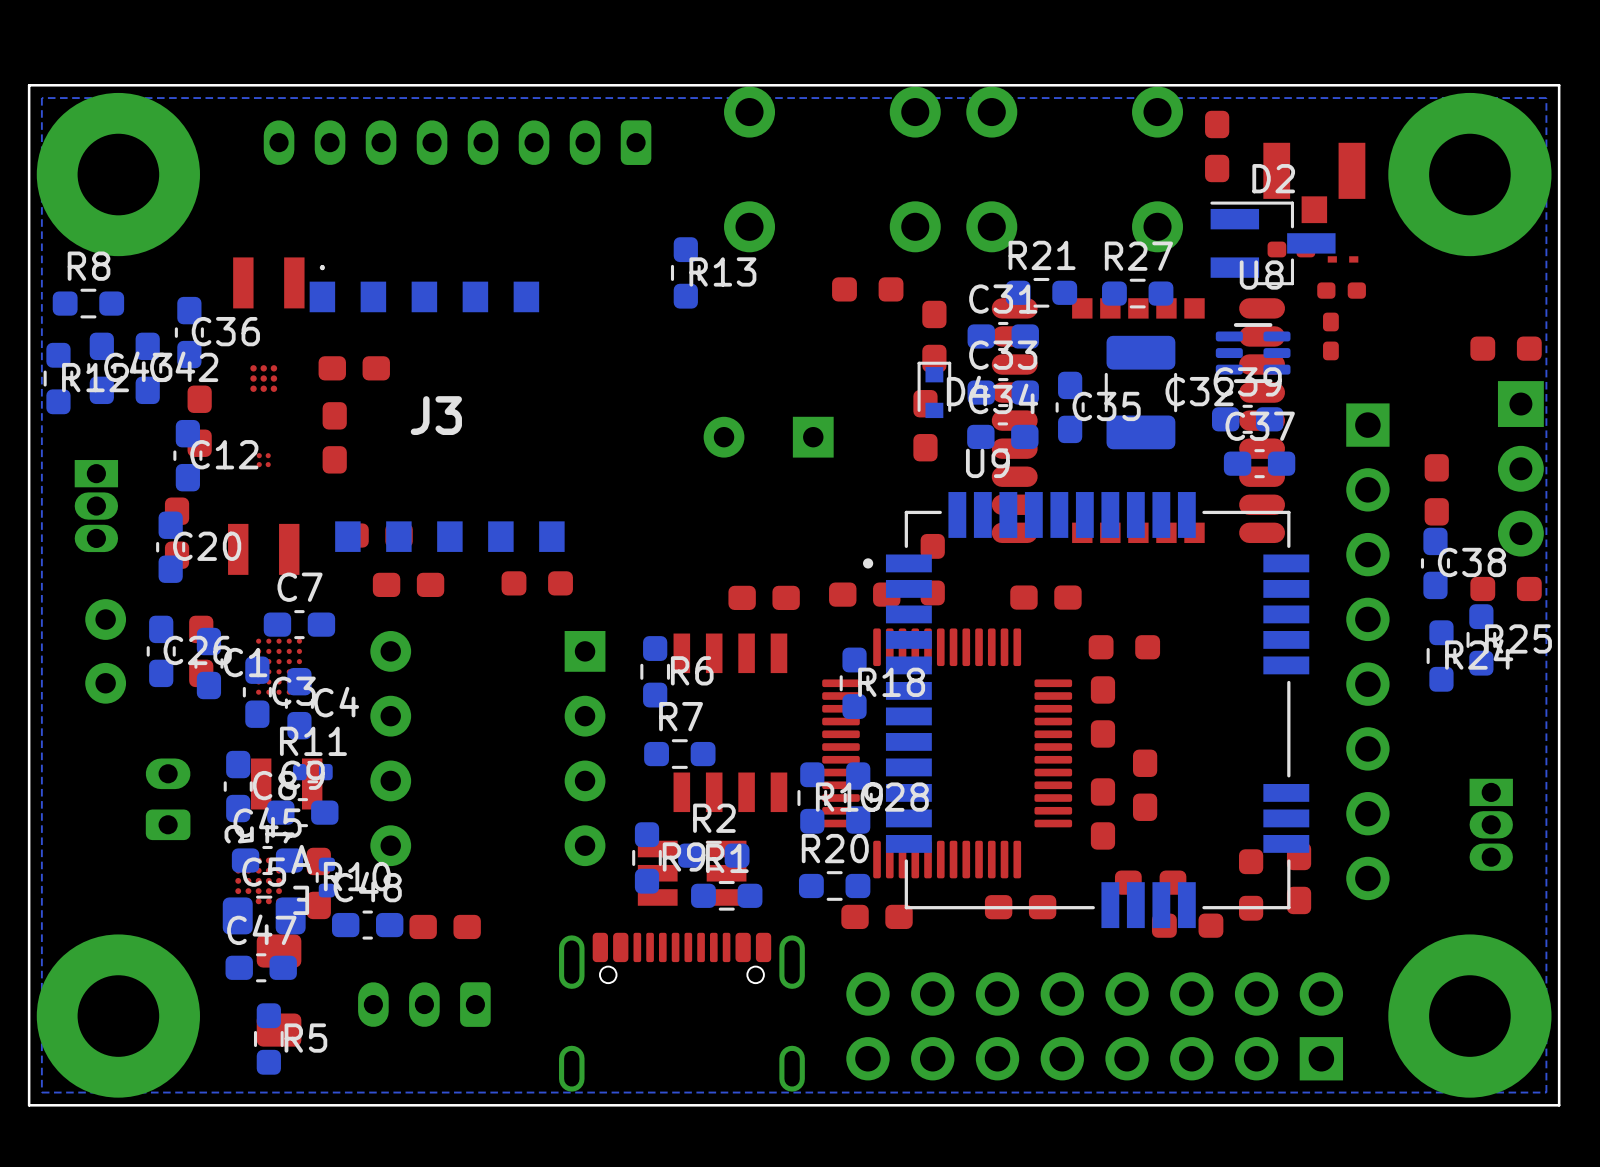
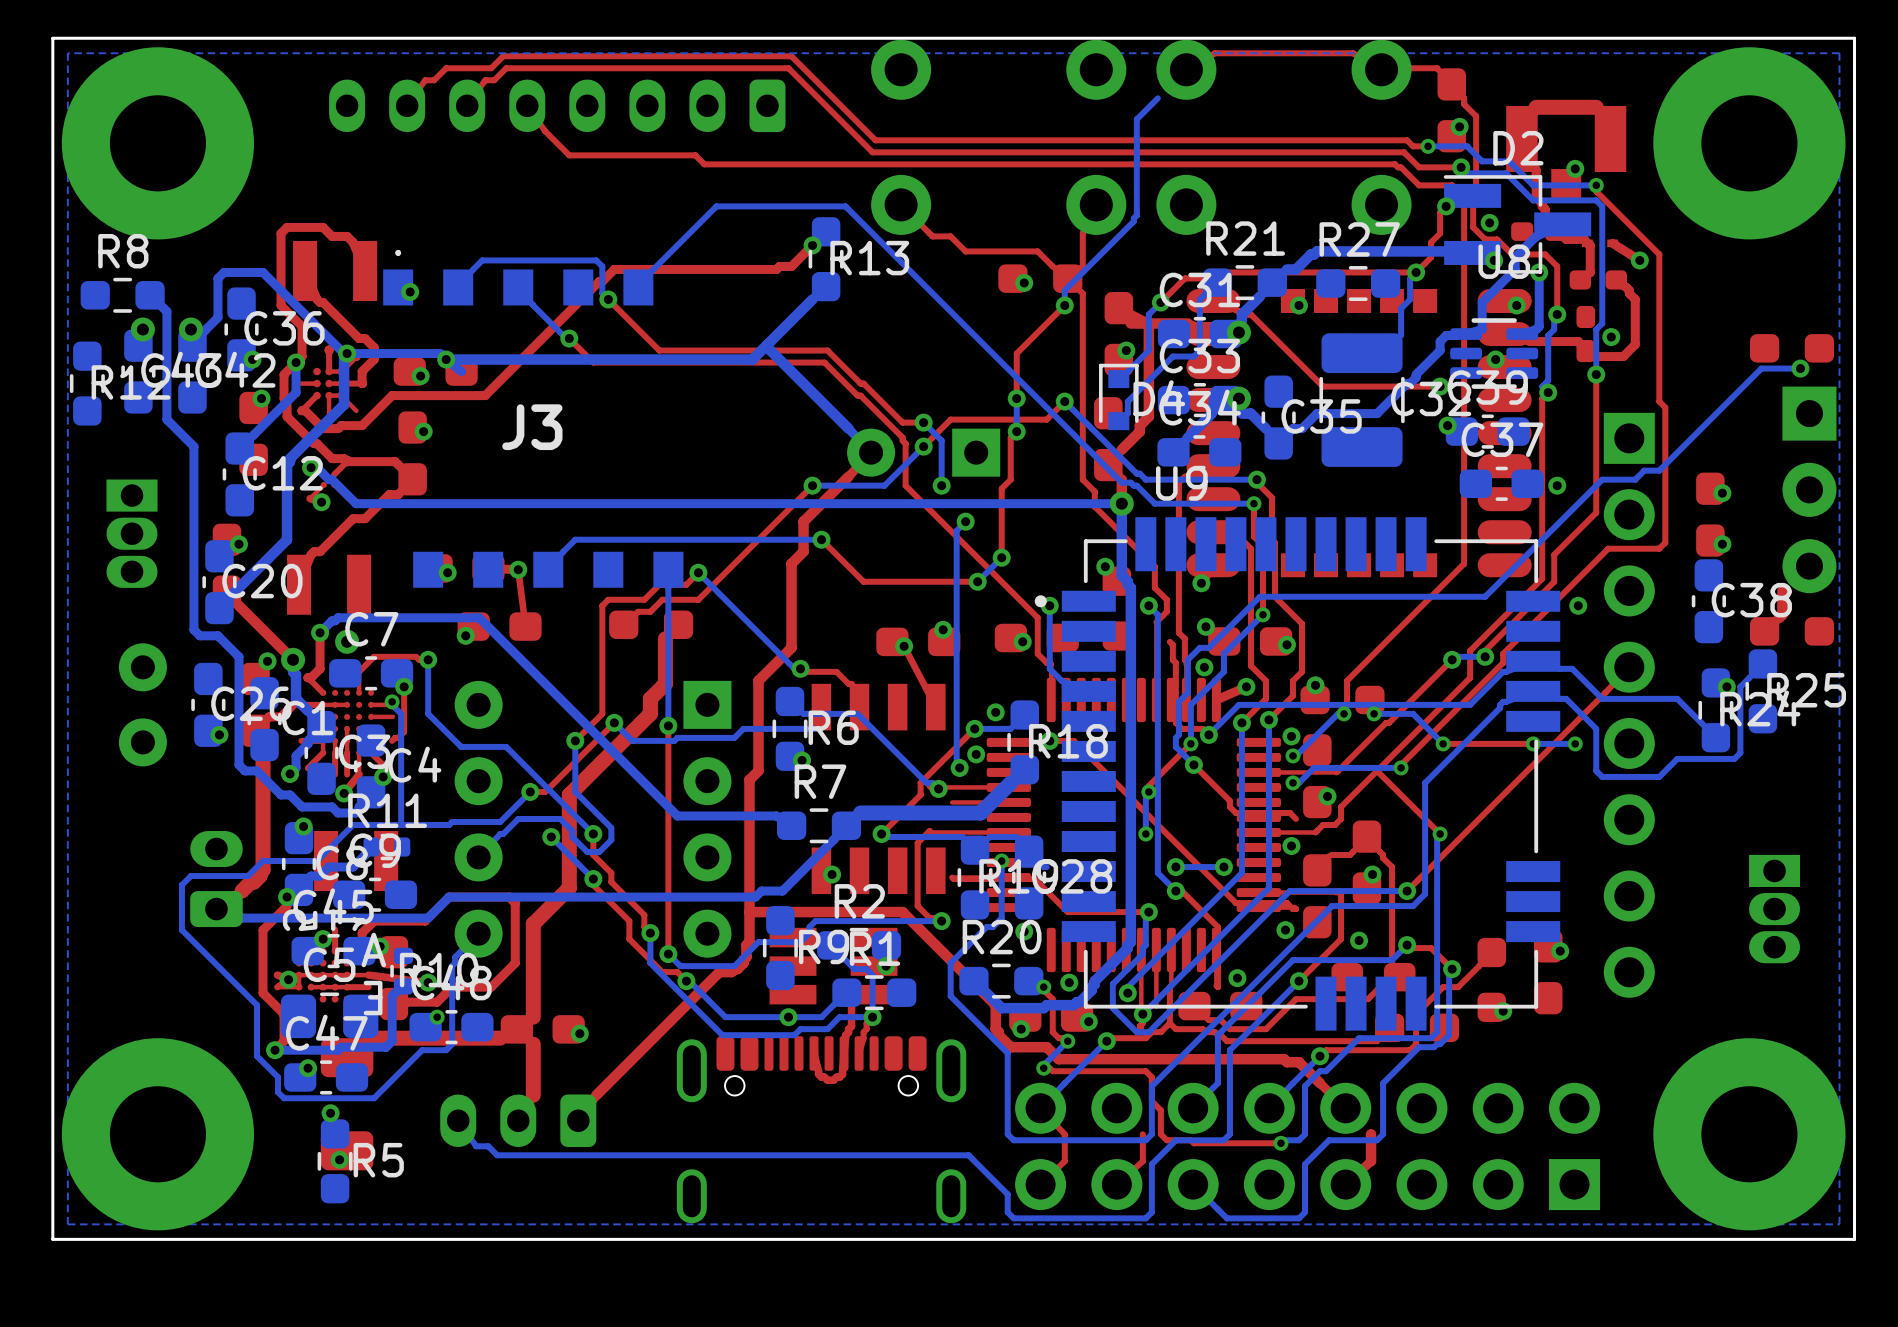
top track: none -> (1186, 69) (1214, 53) (1353, 53) (1381, 69) (1437, 68) (1464, 98) (1464, 104) (1476, 116) (1476, 200) (1473, 203) (1473, 227) (1485, 239) (1497, 239) (1512, 254) (1545, 254) (1557, 266) (1557, 314)
bottom track: none -> (1157, 98) (1136, 119) (1136, 215) (1133, 221) (1064, 290) (1064, 305)
top track: none -> (407, 105) (425, 80) (434, 80) (446, 68) (491, 68) (503, 56) (791, 56) (875, 140) (1407, 140) (1413, 146) (1428, 146)
top track: none -> (467, 105) (485, 80) (494, 80) (506, 68) (788, 68) (872, 152) (1404, 152) (1419, 167) (1461, 167)
top track: none -> (527, 105) (545, 131) (569, 155) (695, 155) (704, 164) (1395, 164) (1401, 167) (1419, 185) (1452, 185) (1464, 197) (1464, 563) (1347, 680) (1347, 704) (1344, 707) (1344, 713)
via: none -> (1459, 126)
top track: none -> (1610, 138) (1596, 107) (1536, 107) (1521, 138) (1536, 170) (1536, 197) (1545, 209) (1545, 224) (1566, 239) (1584, 239) (1590, 245) (1590, 272) (1580, 279)
bottom track: none -> (1428, 146) (1467, 146) (1482, 161) (1509, 161) (1533, 185) (1596, 185)
via: none -> (1428, 146)
bottom track: none -> (1461, 167) (1467, 173) (1506, 173) (1533, 200) (1596, 200) (1602, 206) (1602, 323) (1596, 329) (1596, 374)
via: none -> (1461, 167)
via: none -> (1575, 168)
top track: none -> (1596, 185) (1596, 191) (1659, 254) (1659, 401) (1665, 407) (1665, 542) (1659, 548) (1608, 548) (1503, 653) (1503, 662) (1401, 764) (1401, 767)
via: none -> (1596, 185)
top track: none -> (901, 204) (932, 236) (950, 236) (965, 251) (1037, 251) (1067, 278)
top track: none -> (1096, 204) (1082, 233) (1082, 266) (1067, 278)
top track: none -> (1446, 206) (1440, 212) (1440, 233) (1431, 242) (1431, 257) (1416, 272) (1226, 272) (1220, 278) (1184, 278) (1160, 302)
via: none -> (1446, 206)
via: none -> (1489, 222)
bottom track: none -> (1562, 224) (1536, 236) (1515, 257) (1515, 269) (1482, 302) (1482, 329) (1466, 334) (1446, 335) (1440, 341) (1440, 350) (1416, 374) (1416, 377) (1410, 383) (1407, 383) (1377, 413) (1317, 413) (1301, 428) (1292, 428) (1278, 443) (1250, 413) (1241, 413) (1225, 400) (1238, 398)
top track: none -> (1612, 243) (1639, 260)
top track: none -> (812, 245) (791, 266) (779, 266) (776, 269) (614, 269) (602, 281) (599, 281) (485, 395) (392, 395) (362, 425) (341, 425) (338, 428) (323, 428) (305, 410) (302, 410)
via: none -> (812, 245)
bottom track: none -> (1494, 260) (1472, 252) (1446, 251) (1317, 251) (1311, 254) (1295, 269) (1286, 269) (1272, 282) (1241, 314) (1241, 320) (1225, 334) (1238, 332)
via: none -> (1494, 260)
via: none -> (1639, 260)
top track: none -> (305, 270) (317, 299) (323, 302) (359, 338) (365, 338) (374, 347) (374, 359) (362, 371) (362, 383)
top track: none -> (365, 270) (353, 242) (347, 236) (332, 236) (323, 227) (287, 227) (281, 233) (281, 305) (302, 326) (302, 356) (284, 374) (284, 398) (287, 401) (287, 416) (332, 458) (344, 458) (347, 461)
bottom track: none -> (1416, 272) (1410, 278) (1410, 299) (1401, 308) (1401, 335)
via: none -> (1416, 272)
bottom track: none -> (1539, 272) (1539, 326) (1536, 329) (1522, 334)
via: none -> (1539, 272)
top track: none -> (1067, 278) (1082, 293) (1082, 479) (1094, 491) (1094, 506) (1154, 566) (1154, 587) (1166, 599) (1166, 611) (1156, 622) (1156, 700)
top track: none -> (1616, 279) (1629, 290) (1629, 293) (1635, 299) (1635, 344) (1623, 356) (1593, 356) (1578, 341) (1530, 341) (1504, 334)
bottom track: none -> (1217, 282) (1199, 299) (1199, 350) (1193, 356) (1172, 356) (1127, 401) (1127, 413) (1118, 421)
via: none -> (1024, 282)
bottom track: none -> (458, 287) (482, 260) (596, 260) (602, 266) (602, 293) (608, 299)
bottom track: none -> (518, 287) (566, 338) (569, 338)
bottom track: none -> (638, 287) (653, 269) (716, 206) (845, 206) (1121, 482) (1130, 482) (1136, 485) (1154, 503) (1253, 503)
bottom track: none -> (826, 286) (752, 359) (446, 359)
via: none -> (410, 291)
bottom track: none -> (150, 295) (166, 311) (166, 419) (193, 446) (193, 629) (199, 635) (217, 635) (238, 656) (238, 764) (245, 770) (257, 770) (281, 794) (290, 794) (302, 806) (332, 806) (338, 812) (356, 812) (383, 776)
top track: none -> (608, 299) (659, 350) (827, 350) (902, 422) (923, 422)
via: none -> (608, 299)
top track: none -> (1213, 300) (1250, 314) (1323, 386) (1440, 386)
bottom track: none -> (1160, 302) (1148, 314) (1148, 350) (1118, 379)
via: none -> (1160, 302)
top track: none -> (1064, 305) (1016, 353) (1016, 398)
via: none -> (1064, 305)
via: none -> (1298, 305)
via: none -> (1516, 305)
bottom track: none -> (1557, 314) (1554, 317) (1554, 329) (1548, 335) (1548, 380) (1542, 386) (1548, 392)
via: none -> (1557, 314)
via: none -> (142, 329)
bottom track: none -> (190, 329) (192, 345) (217, 317) (217, 278) (223, 272) (263, 272) (344, 353)
via: none -> (190, 329)
top track: none -> (1238, 332) (1213, 334) (1187, 323) (1130, 323) (1118, 308) (1148, 323) (1148, 416) (1139, 425) (1139, 431) (1108, 465) (1121, 479) (1121, 503)
via: none -> (1238, 332)
via: none -> (1611, 337)
top track: none -> (569, 338) (593, 362) (824, 362) (902, 437) (905, 443) (905, 485) (1037, 617) (1037, 653) (1046, 662) (1051, 664) (1051, 700)
via: none -> (569, 338)
bottom track: none -> (767, 344) (767, 347) (871, 452)
top track: none -> (329, 349) (329, 371) (341, 371) (356, 356)
via: none -> (1126, 350)
bottom track: none -> (344, 353) (440, 353) (446, 359)
bottom track: none -> (344, 353) (344, 404) (290, 458) (287, 464) (287, 539) (219, 608)
via: none -> (347, 353)
via: none -> (252, 359)
bottom track: none -> (446, 359) (461, 371)
via: none -> (446, 359)
via: none -> (1495, 359)
bottom track: none -> (296, 362) (296, 392) (239, 448)
via: none -> (296, 362)
bottom track: none -> (1800, 368) (1761, 368) (1659, 470) (1644, 470) (1635, 479) (1602, 479) (1485, 596) (1259, 596) (1208, 647) (1199, 647) (1187, 659) (1187, 692) (1178, 701) (1178, 734) (1175, 737) (1175, 746) (1193, 764)
via: none -> (1800, 368)
top track: none -> (1596, 374) (1596, 512) (1554, 554) (1554, 581) (1485, 650) (1485, 656)
via: none -> (1596, 374)
via: none -> (420, 376)
top track: none -> (317, 383) (295, 383)
top track: none -> (362, 383) (329, 383)
via: none -> (1440, 386)
top track: none -> (1548, 392) (1542, 398) (1542, 578) (1470, 650) (1470, 677) (1341, 806) (1341, 818) (1335, 824) (1323, 824) (1315, 832) (1258, 832)
via: none -> (1548, 392)
top track: none -> (317, 395) (301, 410)
via: none -> (261, 398)
bottom track: none -> (1016, 398) (1016, 431)
via: none -> (1016, 398)
via: none -> (1238, 398)
bottom track: none -> (1213, 400) (1211, 413) (1173, 452)
top track: none -> (1064, 401) (1046, 419) (950, 419) (923, 446)
bottom track: none -> (1064, 401) (1136, 473) (1139, 473) (1145, 479) (1256, 479)
via: none -> (1064, 401)
top track: none -> (356, 410) (341, 395) (329, 395) (329, 417)
bottom track: none -> (923, 422) (941, 440) (941, 485)
via: none -> (923, 422)
via: none -> (1447, 425)
via: none -> (423, 431)
top track: none -> (1016, 431) (1010, 437) (1010, 479) (1001, 488) (1001, 557)
via: none -> (1016, 431)
bottom track: none -> (923, 446) (884, 485) (812, 485)
via: none -> (923, 446)
top track: none -> (871, 452) (803, 521) (803, 551) (791, 563) (791, 647) (758, 680) (758, 770) (749, 779) (749, 942) (746, 945) (746, 957) (737, 969) (731, 972) (719, 972) (596, 1095) (578, 1120)
top track: none -> (347, 461) (334, 474)
top track: none -> (347, 461) (395, 461) (412, 479) (398, 494) (389, 494) (365, 518) (353, 518) (320, 551) (314, 551) (299, 584)
top track: none -> (1213, 466) (1184, 476) (1178, 482) (1178, 632) (1184, 638) (1184, 659) (1187, 662) (1186, 700)
bottom track: none -> (311, 467) (317, 467) (329, 479) (332, 479) (356, 503) (1121, 503) (1121, 575) (1130, 587) (1130, 942) (1127, 948) (1094, 981) (1091, 990) (1079, 1002) (1073, 1005) (1046, 1005) (1043, 1008) (1001, 1008) (973, 981)
via: none -> (311, 467)
top track: none -> (1256, 479) (1256, 482) (1271, 497) (1271, 539) (1274, 542) (1274, 596) (1301, 623) (1301, 671) (1292, 680) (1292, 695) (1268, 719)
via: none -> (1256, 479)
top track: none -> (323, 484) (310, 498) (321, 502)
top track: none -> (812, 485) (698, 599) (662, 599) (650, 611) (638, 611) (623, 624)
via: none -> (812, 485)
via: none -> (941, 485)
via: none -> (1557, 485)
via: none -> (1722, 493)
via: none -> (321, 502)
via: none -> (1121, 503)
top track: none -> (1253, 503) (1253, 536) (1262, 545) (1262, 614)
via: none -> (1253, 503)
bottom track: none -> (965, 521) (956, 530) (956, 764) (959, 767)
via: none -> (965, 521)
top track: none -> (1213, 532) (1238, 542) (1244, 542) (1250, 548) (1250, 665) (1265, 680) (1265, 698) (1241, 722)
top track: none -> (821, 539) (863, 581) (977, 581)
bottom track: none -> (821, 539) (575, 539) (548, 569)
via: none -> (821, 539)
via: none -> (238, 544)
via: none -> (1722, 544)
bottom track: none -> (1001, 557) (977, 581)
via: none -> (1001, 557)
via: none -> (1105, 566)
top track: none -> (488, 568) (518, 569) (525, 626)
via: none -> (518, 569)
bottom track: none -> (668, 569) (668, 725)
via: none -> (447, 572)
top track: none -> (698, 572) (686, 584) (659, 584) (644, 599) (608, 599) (602, 605) (602, 713) (575, 740)
bottom track: none -> (698, 572) (794, 668) (800, 668)
via: none -> (698, 572)
via: none -> (977, 581)
via: none -> (1201, 583)
top track: none -> (1782, 590) (1782, 614) (1764, 631)
top track: none -> (226, 591) (293, 659)
bottom track: none -> (1049, 605) (1049, 668) (1061, 680) (1088, 691)
via: none -> (1049, 605)
bottom track: none -> (1148, 605) (1157, 614) (1157, 873) (1175, 891)
via: none -> (1148, 605)
via: none -> (1578, 605)
bottom track: none -> (1262, 614) (1223, 653) (1223, 671) (1190, 704) (1190, 743)
via: none -> (1262, 614)
top track: none -> (678, 624) (665, 638) (665, 683) (650, 698) (650, 713) (569, 794) (569, 888) (533, 924) (533, 1017) (516, 1029)
via: none -> (1205, 626)
via: none -> (943, 629)
top track: none -> (320, 632) (320, 668) (311, 677) (308, 677)
bottom track: none -> (320, 632) (332, 620) (338, 617) (479, 617) (677, 815) (776, 815) (791, 825)
via: none -> (320, 632)
via: none -> (465, 635)
via: none -> (347, 641)
top track: none -> (892, 641) (904, 646) (935, 707)
via: none -> (1022, 641)
top track: none -> (1169, 641) (1172, 644) (1172, 659) (1175, 662) (1175, 722) (1181, 728) (1202, 728) (1208, 734)
via: none -> (1286, 644)
via: none -> (904, 646)
bottom track: none -> (1485, 656) (1455, 656) (1452, 659)
via: none -> (1485, 656)
bottom track: none -> (293, 659) (293, 671) (296, 674) (296, 698) (321, 727) (296, 755) (296, 767) (290, 773)
via: none -> (293, 659)
top track: none -> (428, 659) (419, 659) (416, 656) (374, 656) (359, 671) (359, 692)
bottom track: none -> (428, 659) (428, 713) (461, 746) (506, 746) (593, 833)
via: none -> (428, 659)
top track: none -> (1452, 659) (1336, 772) (1258, 772)
via: none -> (1452, 659)
via: none -> (267, 661)
bottom track: none -> (1762, 663) (1740, 686) (1740, 752) (1734, 758) (1677, 758) (1659, 776) (1602, 776) (1596, 770) (1596, 728) (1566, 698) (1533, 691) (1503, 701) (1500, 707) (1425, 782) (1425, 894) (1413, 906) (1332, 906) (1151, 1086) (1151, 1134) (1145, 1140) (1013, 1140) (1007, 1134) (1007, 1053) (950, 996) (950, 963) (986, 927) (992, 927) (1001, 918) (1001, 861)
via: none -> (1204, 667)
top track: none -> (1629, 667) (1407, 891)
top track: none -> (800, 668) (803, 671) (836, 671) (848, 683) (851, 683) (859, 707)
via: none -> (800, 668)
top track: none -> (307, 677) (323, 692)
via: none -> (1315, 685)
top track: none -> (404, 686) (404, 731) (392, 740)
via: none -> (404, 686)
top track: none -> (1246, 686) (1216, 700)
via: none -> (1246, 686)
via: none -> (1726, 686)
bottom track: none -> (392, 701) (392, 704) (401, 713) (401, 824)
via: none -> (392, 701)
bottom track: none -> (790, 701) (803, 713) (857, 713) (926, 782) (932, 782) (938, 788)
top track: none -> (302, 704) (296, 701) (281, 716) (269, 716) (255, 730) (263, 746) (263, 870) (254, 882) (251, 882) (242, 891) (216, 909)
top track: none -> (347, 704) (301, 704)
top track: none -> (392, 704) (371, 704)
via: none -> (995, 712)
bottom track: none -> (1344, 713) (1338, 713) (1295, 755) (1292, 755)
via: none -> (1344, 713)
bottom track: none -> (1374, 713) (1413, 713) (1443, 743)
via: none -> (1374, 713)
bottom track: none -> (1024, 715) (1010, 728) (974, 728)
top track: none -> (392, 716) (371, 716)
bottom track: none -> (1268, 719) (1268, 888) (1142, 1014)
via: none -> (1268, 719)
top track: none -> (614, 722) (545, 791) (530, 791)
bottom track: none -> (614, 722) (632, 740) (674, 740) (677, 737) (734, 737) (743, 728) (815, 728)
via: none -> (614, 722)
bottom track: none -> (1241, 722) (1241, 873) (1127, 987) (1127, 993)
via: none -> (1241, 722)
top track: none -> (668, 725) (668, 954)
via: none -> (668, 725)
top track: none -> (347, 728) (347, 774)
top track: none -> (359, 728) (359, 774) (344, 793)
top track: none -> (974, 728) (920, 782) (920, 794) (881, 833)
via: none -> (974, 728)
via: none -> (219, 734)
bottom track: none -> (1208, 734) (1238, 704) (1470, 704) (1503, 671) (1533, 661) (1560, 668) (1572, 668) (1602, 698) (1677, 698) (1715, 737)
via: none -> (1208, 734)
via: none -> (1291, 736)
top track: none -> (301, 740) (323, 740) (323, 752) (307, 768)
top track: none -> (335, 740) (335, 774)
bottom track: none -> (575, 740) (575, 791) (611, 827) (611, 840) (599, 852) (587, 852) (572, 837) (572, 830) (560, 818) (518, 818) (503, 833) (500, 833) (478, 857)
via: none -> (575, 740)
top track: none -> (1049, 740) (1073, 740) (1235, 903) (1286, 903) (1292, 909) (1295, 909) (1294, 907) (1258, 907)
via: none -> (1049, 740)
top track: none -> (1190, 743) (1148, 785) (1148, 791)
via: none -> (1190, 743)
via: none -> (1443, 743)
top track: none -> (1533, 743) (1443, 743)
via: none -> (1533, 743)
bottom track: none -> (1575, 743) (1533, 743)
via: none -> (1575, 743)
top track: none -> (371, 752) (386, 768)
via: none -> (976, 754)
via: none -> (1292, 755)
via: none -> (802, 760)
top track: none -> (1193, 764) (1229, 800) (1229, 806) (1235, 812) (1289, 812) (1295, 818)
via: none -> (1193, 764)
via: none -> (959, 767)
bottom track: none -> (1401, 767) (1314, 767) (1298, 782) (1292, 782)
via: none -> (1401, 767)
bottom track: none -> (1024, 769) (980, 812) (860, 812) (782, 891) (761, 891) (755, 897) (449, 897) (428, 918) (242, 918) (216, 909)
top track: none -> (1377, 770) (1440, 833)
via: none -> (290, 773)
via: none -> (383, 776)
via: none -> (1292, 782)
top track: none -> (1008, 787) (931, 787)
via: none -> (938, 788)
bottom track: none -> (530, 791) (500, 821) (452, 821) (449, 824) (353, 824) (317, 861) (263, 861) (248, 876) (190, 876) (181, 885) (181, 930) (257, 1005) (257, 1056) (278, 1077) (278, 1092) (284, 1098) (374, 1098) (422, 1050) (446, 1050) (452, 1044) (452, 966) (455, 963) (455, 957) (478, 933)
via: none -> (530, 791)
bottom track: none -> (1148, 791) (1145, 794) (1145, 833)
via: none -> (1148, 791)
via: none -> (344, 793)
via: none -> (1327, 796)
top track: none -> (1008, 802) (952, 802)
via: none -> (303, 826)
top track: none -> (1008, 832) (929, 830) (917, 843) (917, 906) (929, 918) (938, 918) (941, 921)
top track: none -> (593, 833) (593, 855) (611, 873) (611, 882) (644, 915) (644, 927) (650, 933)
via: none -> (593, 833)
bottom track: none -> (881, 833) (884, 837) (962, 837) (975, 850) (989, 837) (1016, 837) (1043, 867) (1046, 867)
via: none -> (881, 833)
via: none -> (1145, 833)
bottom track: none -> (1440, 833) (1437, 837) (1437, 1032) (1431, 1038) (1359, 1038) (1326, 1071) (1320, 1071) (1304, 1086) (1304, 1134) (1298, 1140) (1283, 1140) (1280, 1143)
via: none -> (1440, 833)
bottom track: none -> (551, 837) (593, 879)
via: none -> (551, 837)
via: none -> (1291, 846)
bottom track: none -> (371, 847) (353, 867) (329, 867) (320, 876) (311, 876) (299, 889) (287, 897)
via: none -> (1001, 861)
via: none -> (1175, 867)
bottom track: none -> (1223, 867) (1175, 867)
via: none -> (1223, 867)
top track: none -> (1317, 870) (1317, 861) (1315, 862) (1332, 855) (1350, 855) (1366, 836) (1383, 855) (1383, 858) (1392, 867) (1392, 963) (1399, 977) (1386, 990) (1377, 990) (1368, 999) (1295, 999) (1265, 1029) (1229, 1029) (1220, 1020) (1208, 1020) (1194, 1006)
via: none -> (832, 874)
via: none -> (1372, 874)
top track: none -> (1008, 877) (952, 877) (1034, 879) (1067, 912) (1148, 912)
top track: none -> (593, 879) (593, 885) (629, 921) (629, 939) (662, 972) (677, 972) (686, 981)
via: none -> (593, 879)
top track: none -> (1175, 891) (1181, 891) (1217, 927) (1217, 987) (1216, 949)
via: none -> (1175, 891)
bottom track: none -> (1407, 891) (1289, 891) (1148, 1032) (1136, 1032) (1112, 1008) (1112, 984) (1142, 954) (1142, 948) (1145, 945) (1145, 915) (1148, 912)
via: none -> (1407, 891)
top track: none -> (1258, 892) (1338, 891) (1341, 894) (1341, 939) (1298, 981)
top track: none -> (287, 897) (287, 906) (263, 930) (263, 993) (284, 1014) (284, 1041) (275, 1050)
via: none -> (287, 897)
top track: none -> (749, 912) (902, 912) (995, 1005) (995, 1029) (998, 1035) (1010, 1047) (1046, 1047) (1058, 1059) (1283, 1059) (1286, 1062) (1298, 1062) (1345, 1108)
via: none -> (1148, 912)
bottom track: none -> (941, 921) (815, 921) (809, 927) (809, 933) (800, 942) (758, 942) (734, 966) (680, 966) (668, 954)
via: none -> (941, 921)
top track: none -> (335, 929) (335, 951)
via: none -> (1285, 930)
via: none -> (1024, 931)
bottom track: none -> (650, 933) (650, 963) (722, 1035) (794, 1035) (800, 1029) (827, 1029) (839, 1017) (872, 1017) (872, 975) (866, 969) (854, 969) (831, 945)
via: none -> (650, 933)
top track: none -> (362, 936) (362, 933) (374, 921) (425, 921) (449, 897) (509, 897) (515, 903) (515, 963) (491, 987) (452, 987) (437, 1002) (393, 1004)
via: none -> (323, 939)
via: none -> (1359, 940)
top track: none -> (1407, 945) (1410, 948) (1431, 948) (1452, 969)
bottom track: none -> (1407, 945) (1392, 960) (1292, 960) (1217, 1035) (1217, 1083) (1193, 1108)
via: none -> (1407, 945)
via: none -> (380, 946)
top track: none -> (1141, 949) (1141, 1027) (1139, 1029) (1139, 1026) (1142, 1023) (1142, 1014)
top track: none -> (1156, 949) (1156, 1006)
top track: none -> (1171, 949) (1169, 1023)
via: none -> (1560, 951)
top track: none -> (1491, 952) (1458, 987) (1443, 987) (1416, 1014) (1416, 1044) (1410, 1050) (1326, 1050) (1320, 1056)
via: none -> (668, 954)
via: none -> (886, 966)
bottom track: none -> (1452, 969) (1449, 972) (1449, 1035) (1434, 1047) (1419, 1047) (1383, 1083) (1383, 1134) (1377, 1140) (1329, 1140) (1304, 1164) (1304, 1212) (1298, 1218) (1226, 1218) (1193, 1184)
via: none -> (1452, 969)
top track: none -> (299, 975) (299, 987) (277, 987) (288, 979) (277, 975) (368, 975) (428, 982)
via: none -> (1237, 978)
via: none -> (288, 979)
bottom track: none -> (686, 981) (689, 981) (725, 1017) (821, 1017) (846, 992)
via: none -> (686, 981)
bottom track: none -> (1298, 981) (1229, 1050) (1229, 1134) (1223, 1140) (1175, 1140) (1151, 1164) (1151, 1212) (1145, 1218) (1013, 1218) (1007, 1212) (1007, 1194) (968, 1155) (497, 1155) (488, 1146) (476, 1146) (458, 1120)
via: none -> (1298, 981)
via: none -> (428, 982)
via: none -> (1069, 982)
bottom track: none -> (403, 986) (392, 996) (392, 1041) (386, 1047) (341, 1047) (338, 1050) (275, 1050)
top track: none -> (368, 987) (311, 987)
top track: none -> (1043, 987) (1043, 990) (1052, 999) (1052, 1032) (1058, 1038) (1064, 1038) (1067, 1041)
via: none -> (1043, 987)
via: none -> (1127, 993)
top track: none -> (874, 994) (851, 1002) (851, 1026) (845, 1035) (842, 1074) (839, 1077) (833, 1080) (821, 1077) (818, 1074) (814, 1053)
via: none -> (1503, 1011)
via: none -> (1142, 1014)
via: none -> (437, 1017)
via: none -> (788, 1017)
top track: none -> (872, 1017) (866, 1023) (859, 1053)
via: none -> (872, 1017)
via: none -> (1088, 1021)
top track: none -> (1169, 1023) (1175, 1029) (1202, 1029) (1205, 1032) (1214, 1032) (1226, 1041) (1377, 1041) (1389, 1027)
top track: none -> (1169, 1023) (1160, 1032) (1151, 1032) (1145, 1038) (1109, 1038) (1106, 1041)
top track: none -> (516, 1029) (533, 1044) (533, 1095) (518, 1120)
top track: none -> (516, 1029) (500, 1038) (371, 1038) (347, 1057)
via: none -> (1021, 1029)
via: none -> (579, 1033)
bottom track: none -> (1067, 1041) (1043, 1065) (1043, 1068)
via: none -> (1067, 1041)
bottom track: none -> (1106, 1041) (1040, 1108)
via: none -> (1106, 1041)
via: none -> (275, 1050)
bottom track: none -> (1320, 1056) (1269, 1108)
via: none -> (1320, 1056)
via: none -> (308, 1068)
top track: none -> (1043, 1068) (1049, 1068) (1052, 1071) (1145, 1071) (1151, 1077) (1151, 1101) (1160, 1110) (1160, 1134) (1166, 1140) (1190, 1140) (1193, 1143) (1280, 1143)
via: none -> (1043, 1068)
top track: none -> (1040, 1108) (1064, 1134) (1064, 1161) (1040, 1184)
via: none -> (330, 1113)
top track: none -> (1142, 1134) (1142, 1161) (1116, 1184)
top track: none -> (1371, 1134) (1371, 1161) (1345, 1184)
via: none -> (1280, 1143)
via: none -> (339, 1159)

